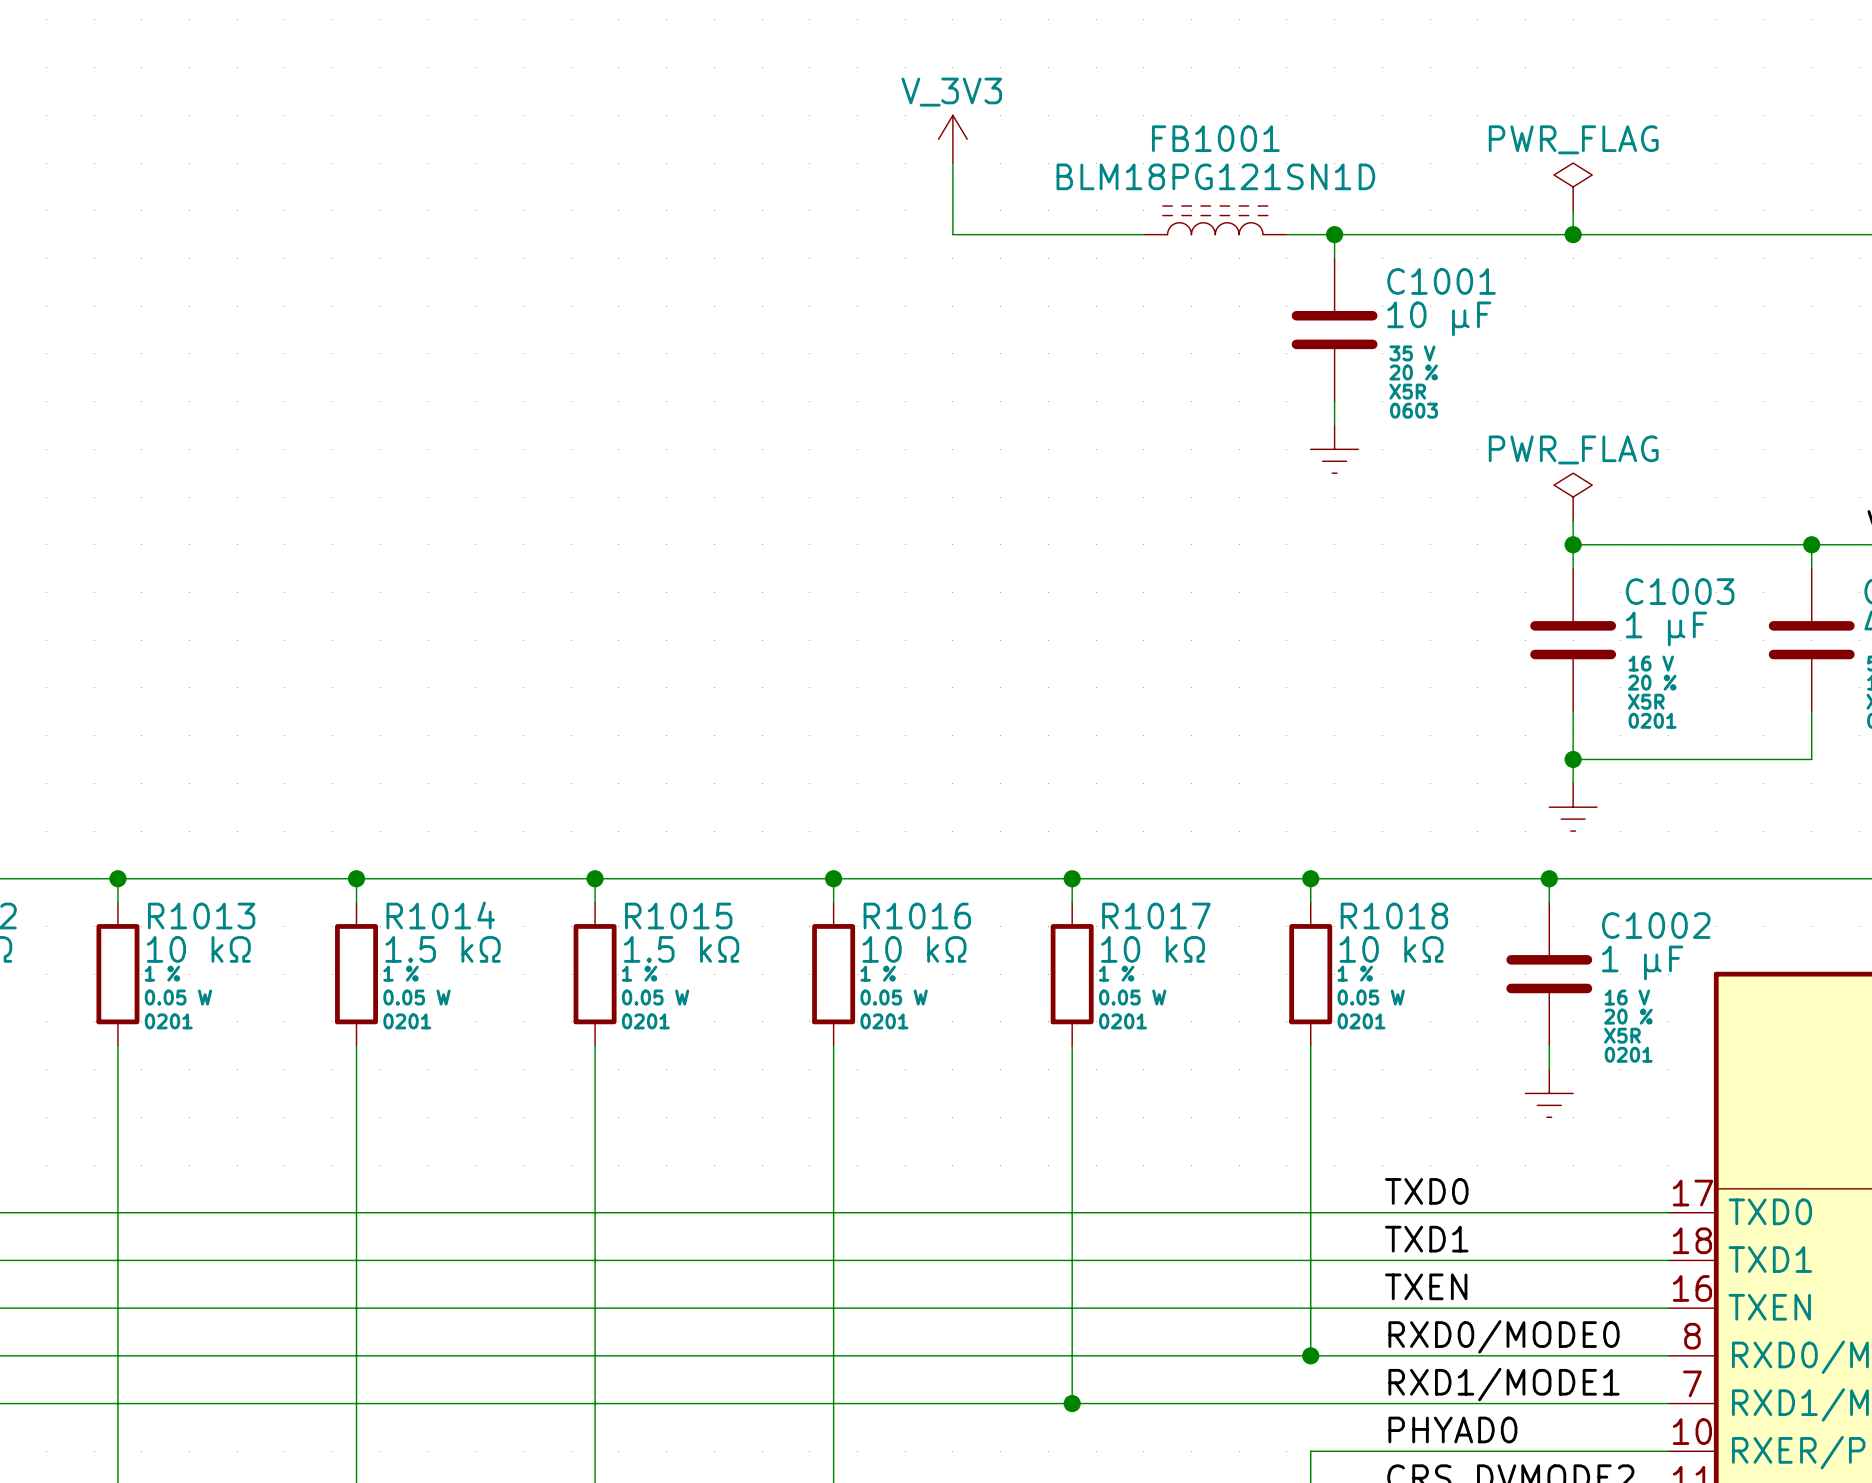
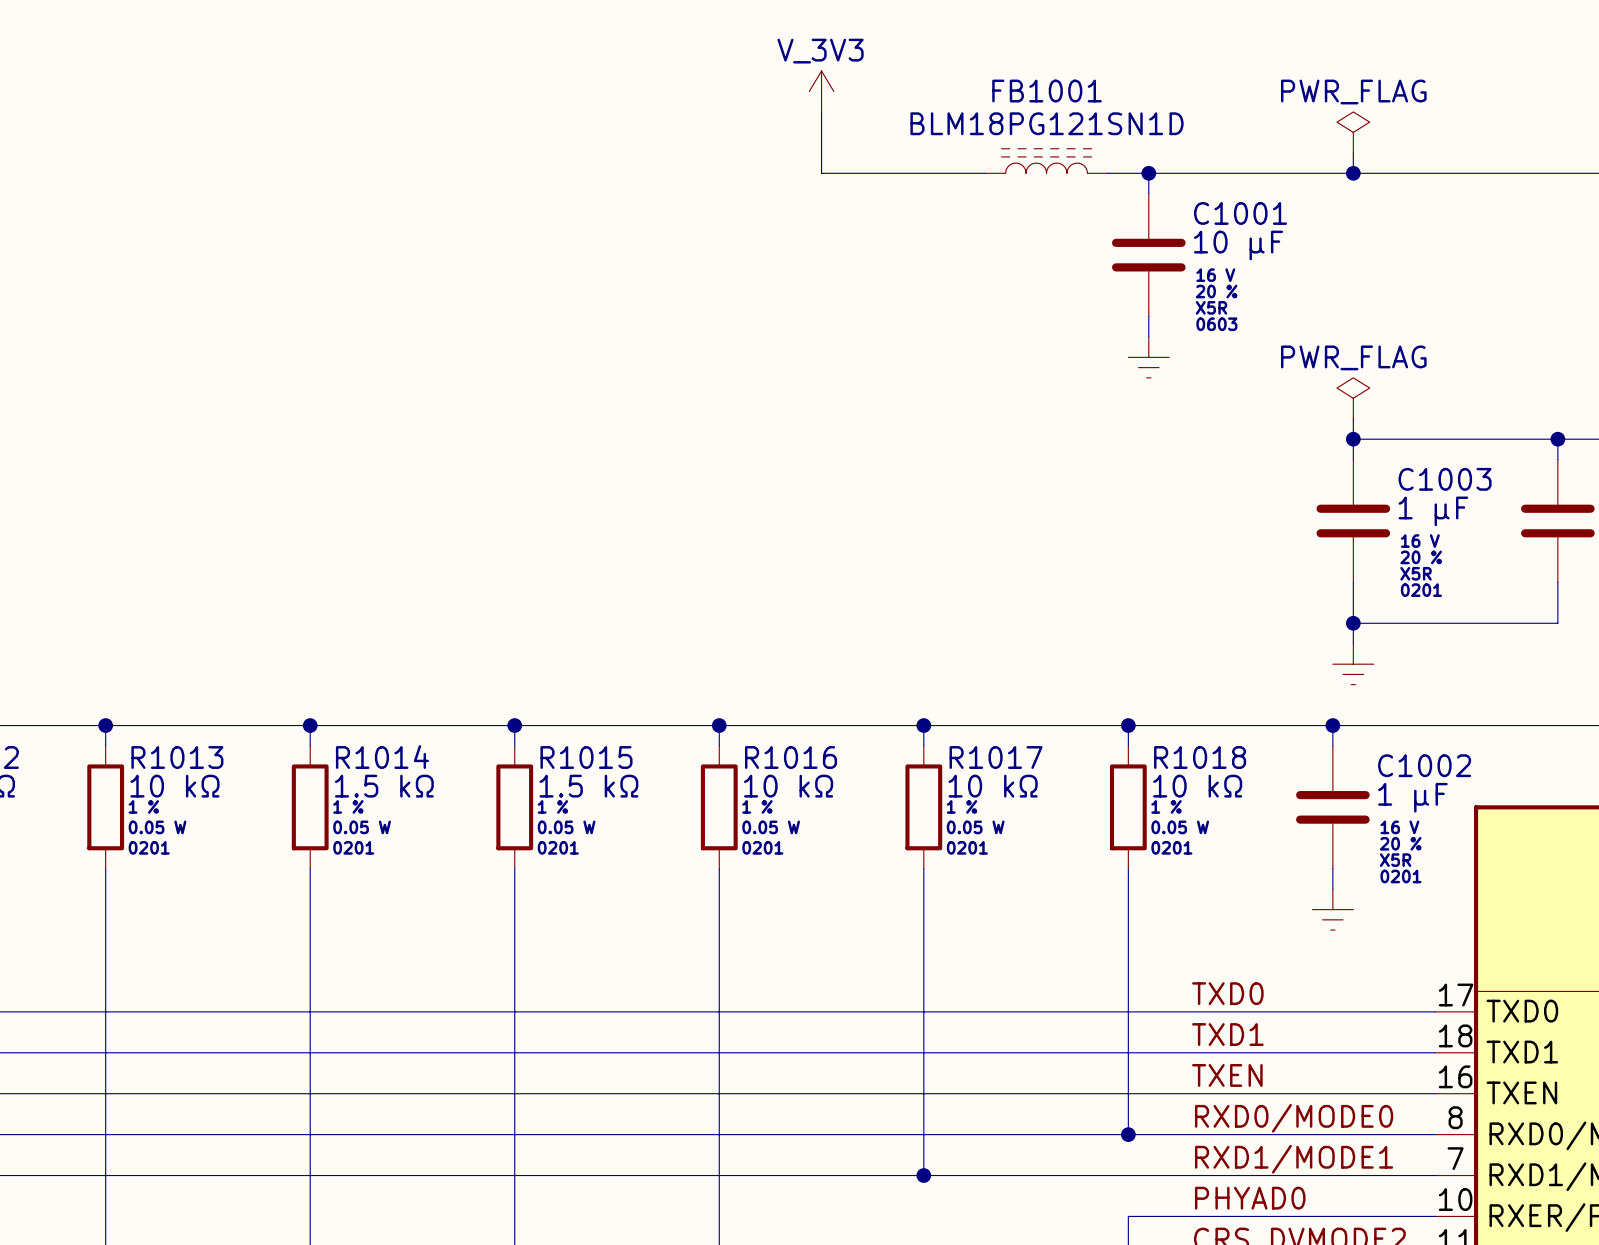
C1001 text: 35 V (1412, 353) -> 16 V (1215, 275)

